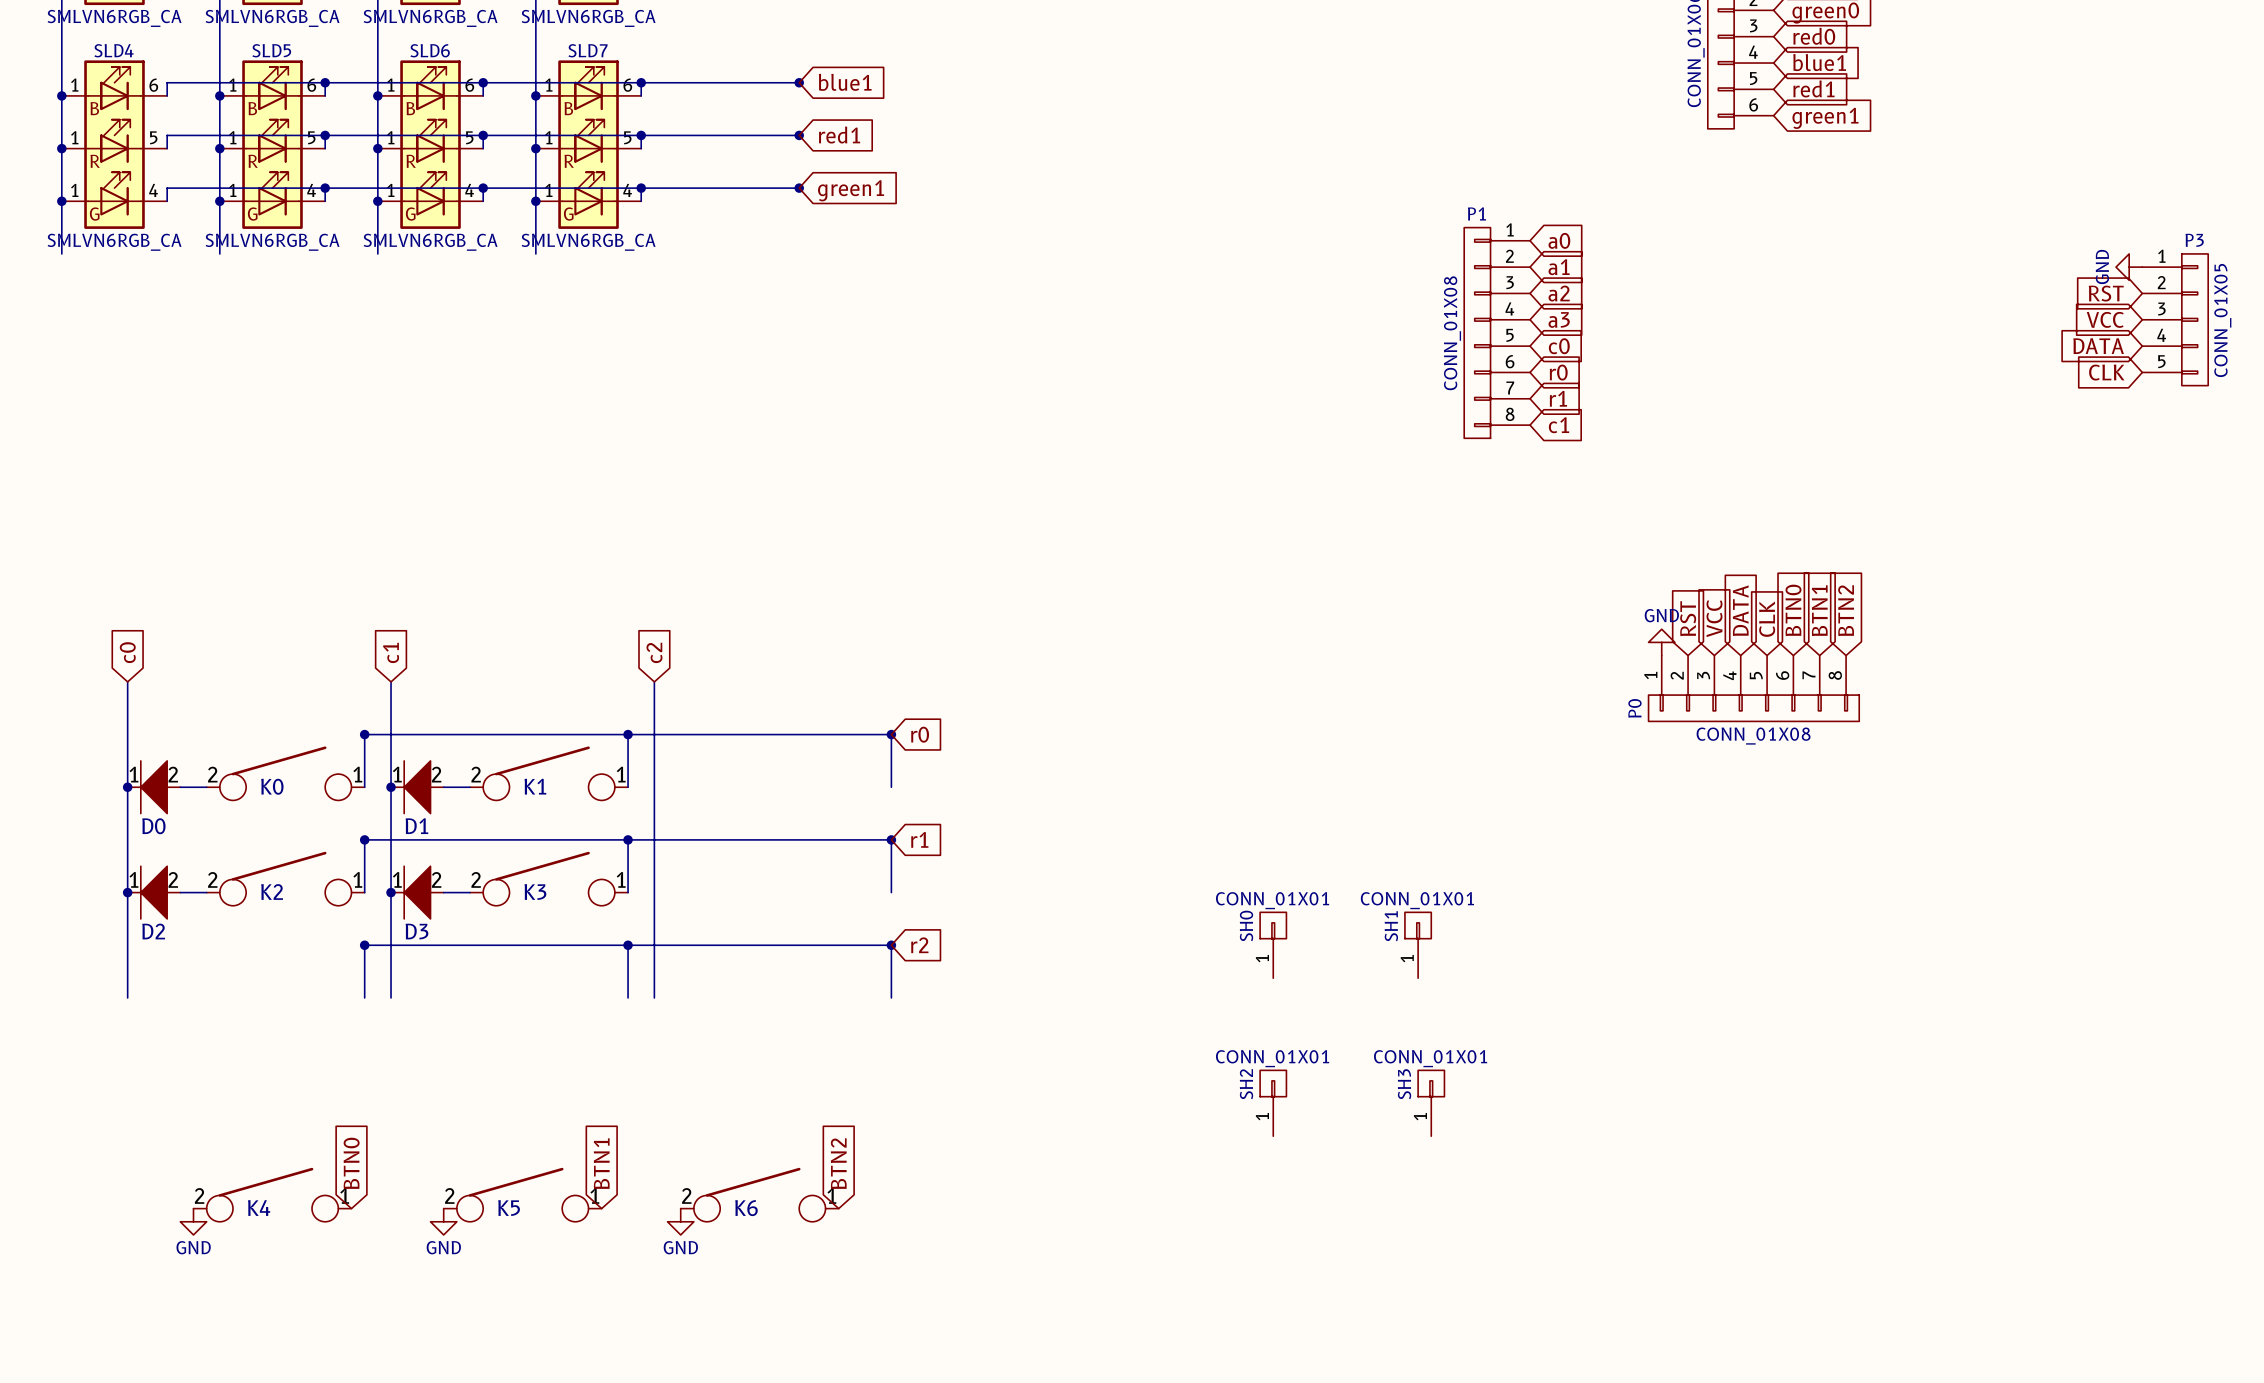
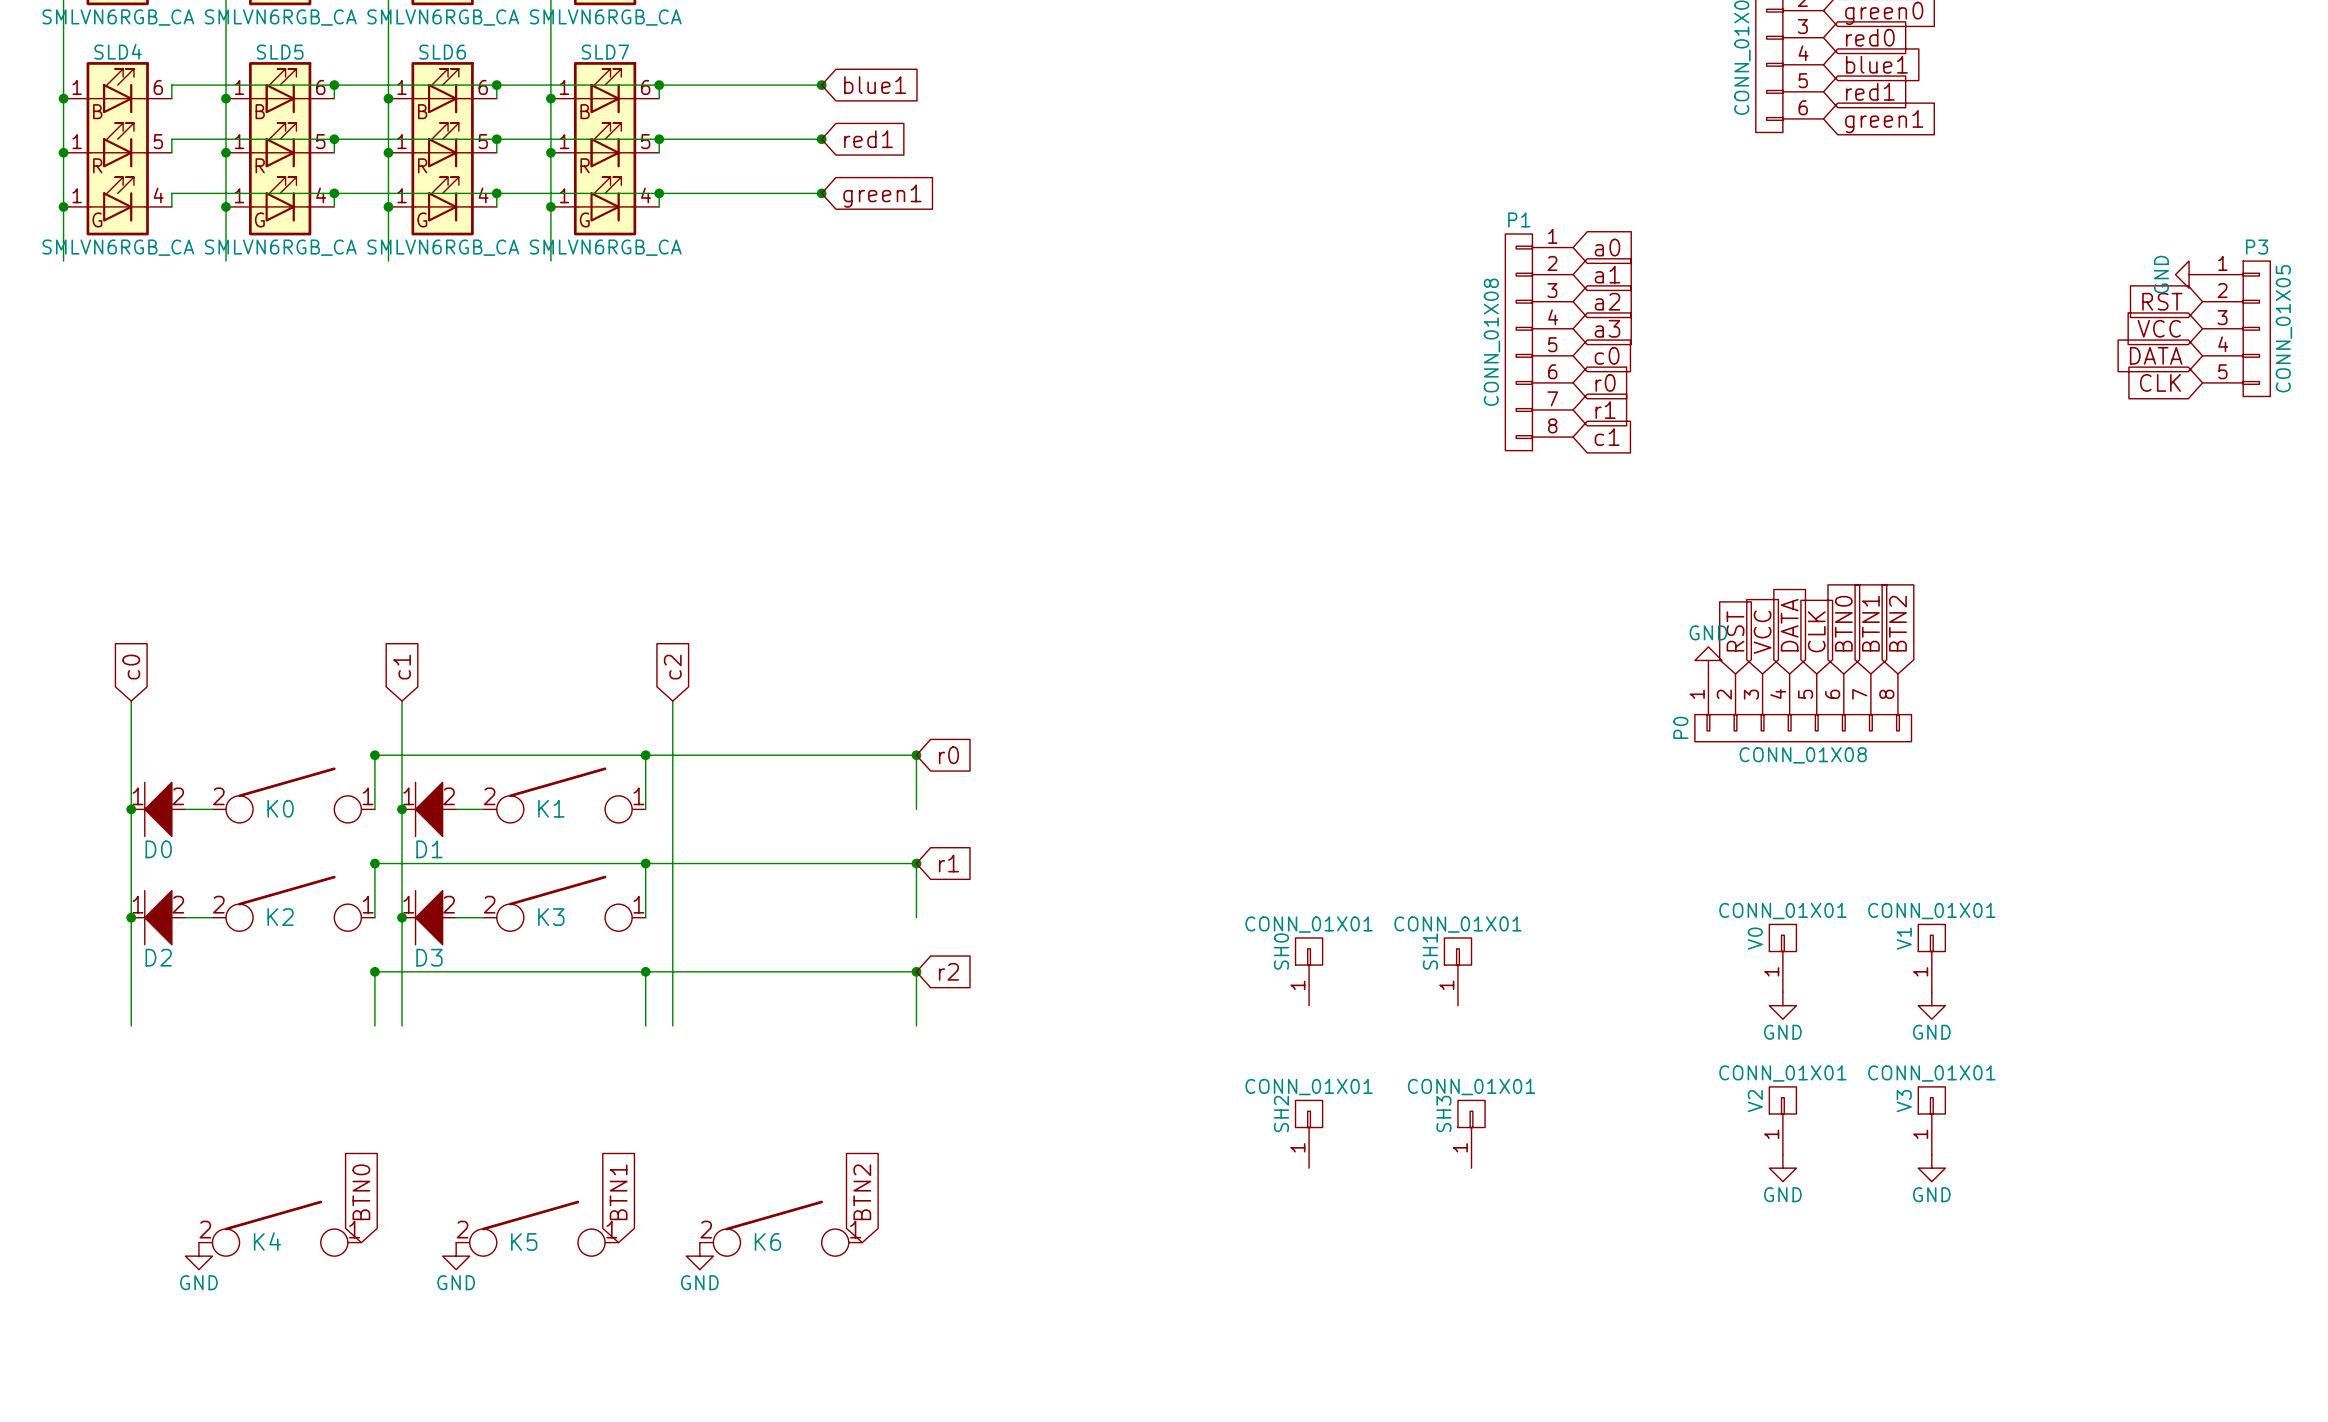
V0: none -> CONN_01X01 (1782, 958)
V1: none -> CONN_01X01 (1931, 958)
power symbol: none -> GND (1782, 1005)
power symbol: none -> GND (1931, 1005)
V2: none -> CONN_01X01 (1782, 1120)
V3: none -> CONN_01X01 (1931, 1120)
power symbol: none -> GND (1782, 1168)
power symbol: none -> GND (1931, 1168)

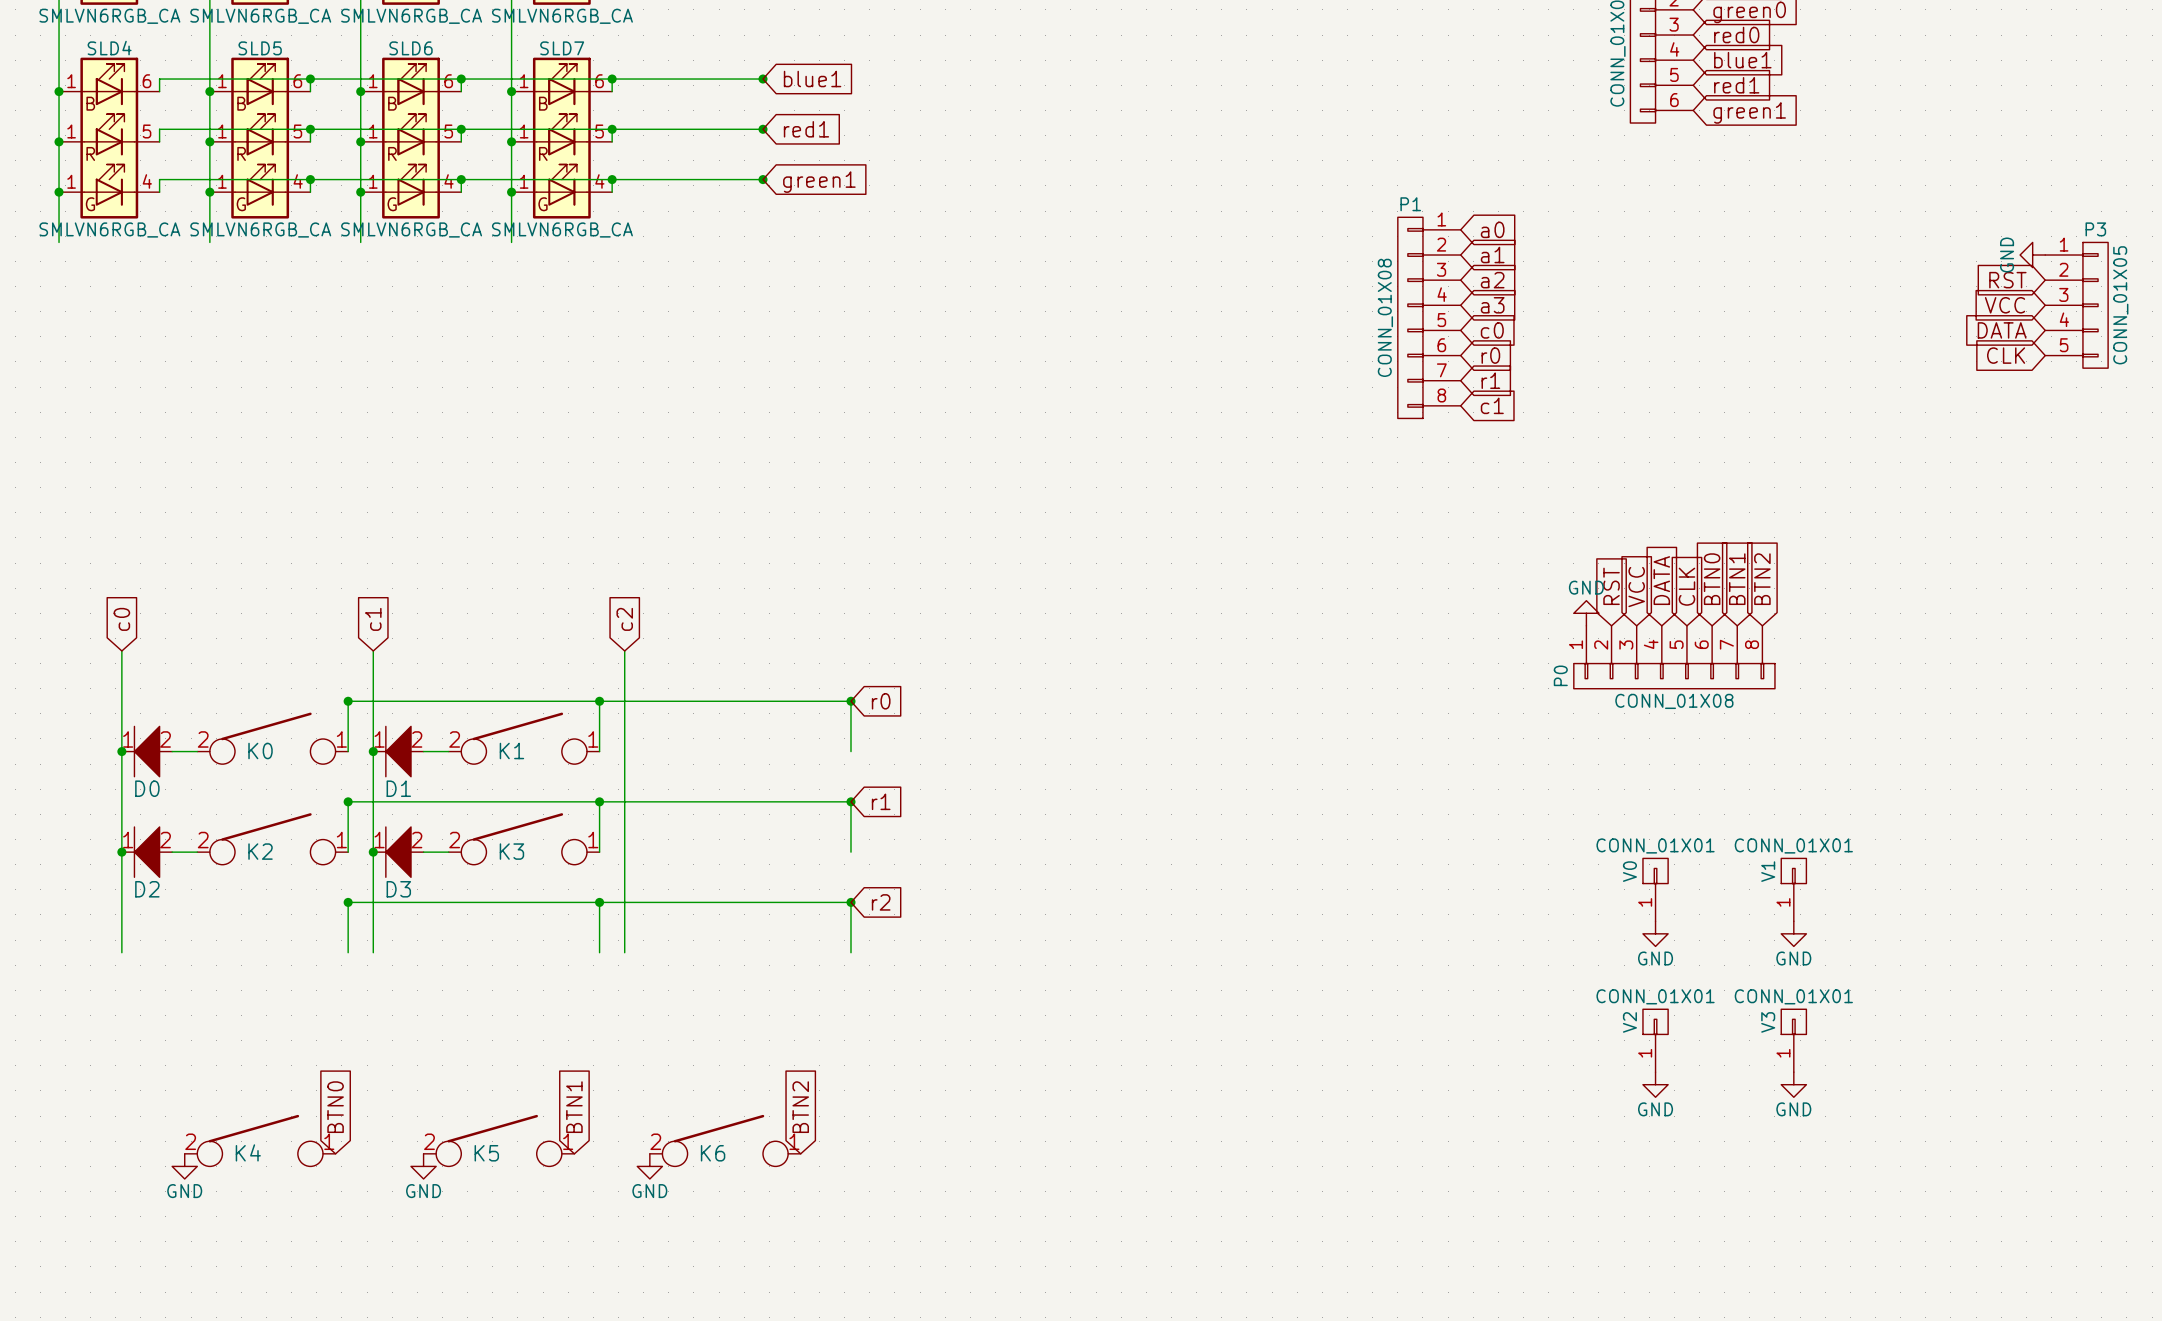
SH0: CONN_01X01 (1309, 971) -> none
SH1: CONN_01X01 (1457, 971) -> none
SH2: CONN_01X01 (1309, 1134) -> none
SH3: CONN_01X01 (1471, 1134) -> none

